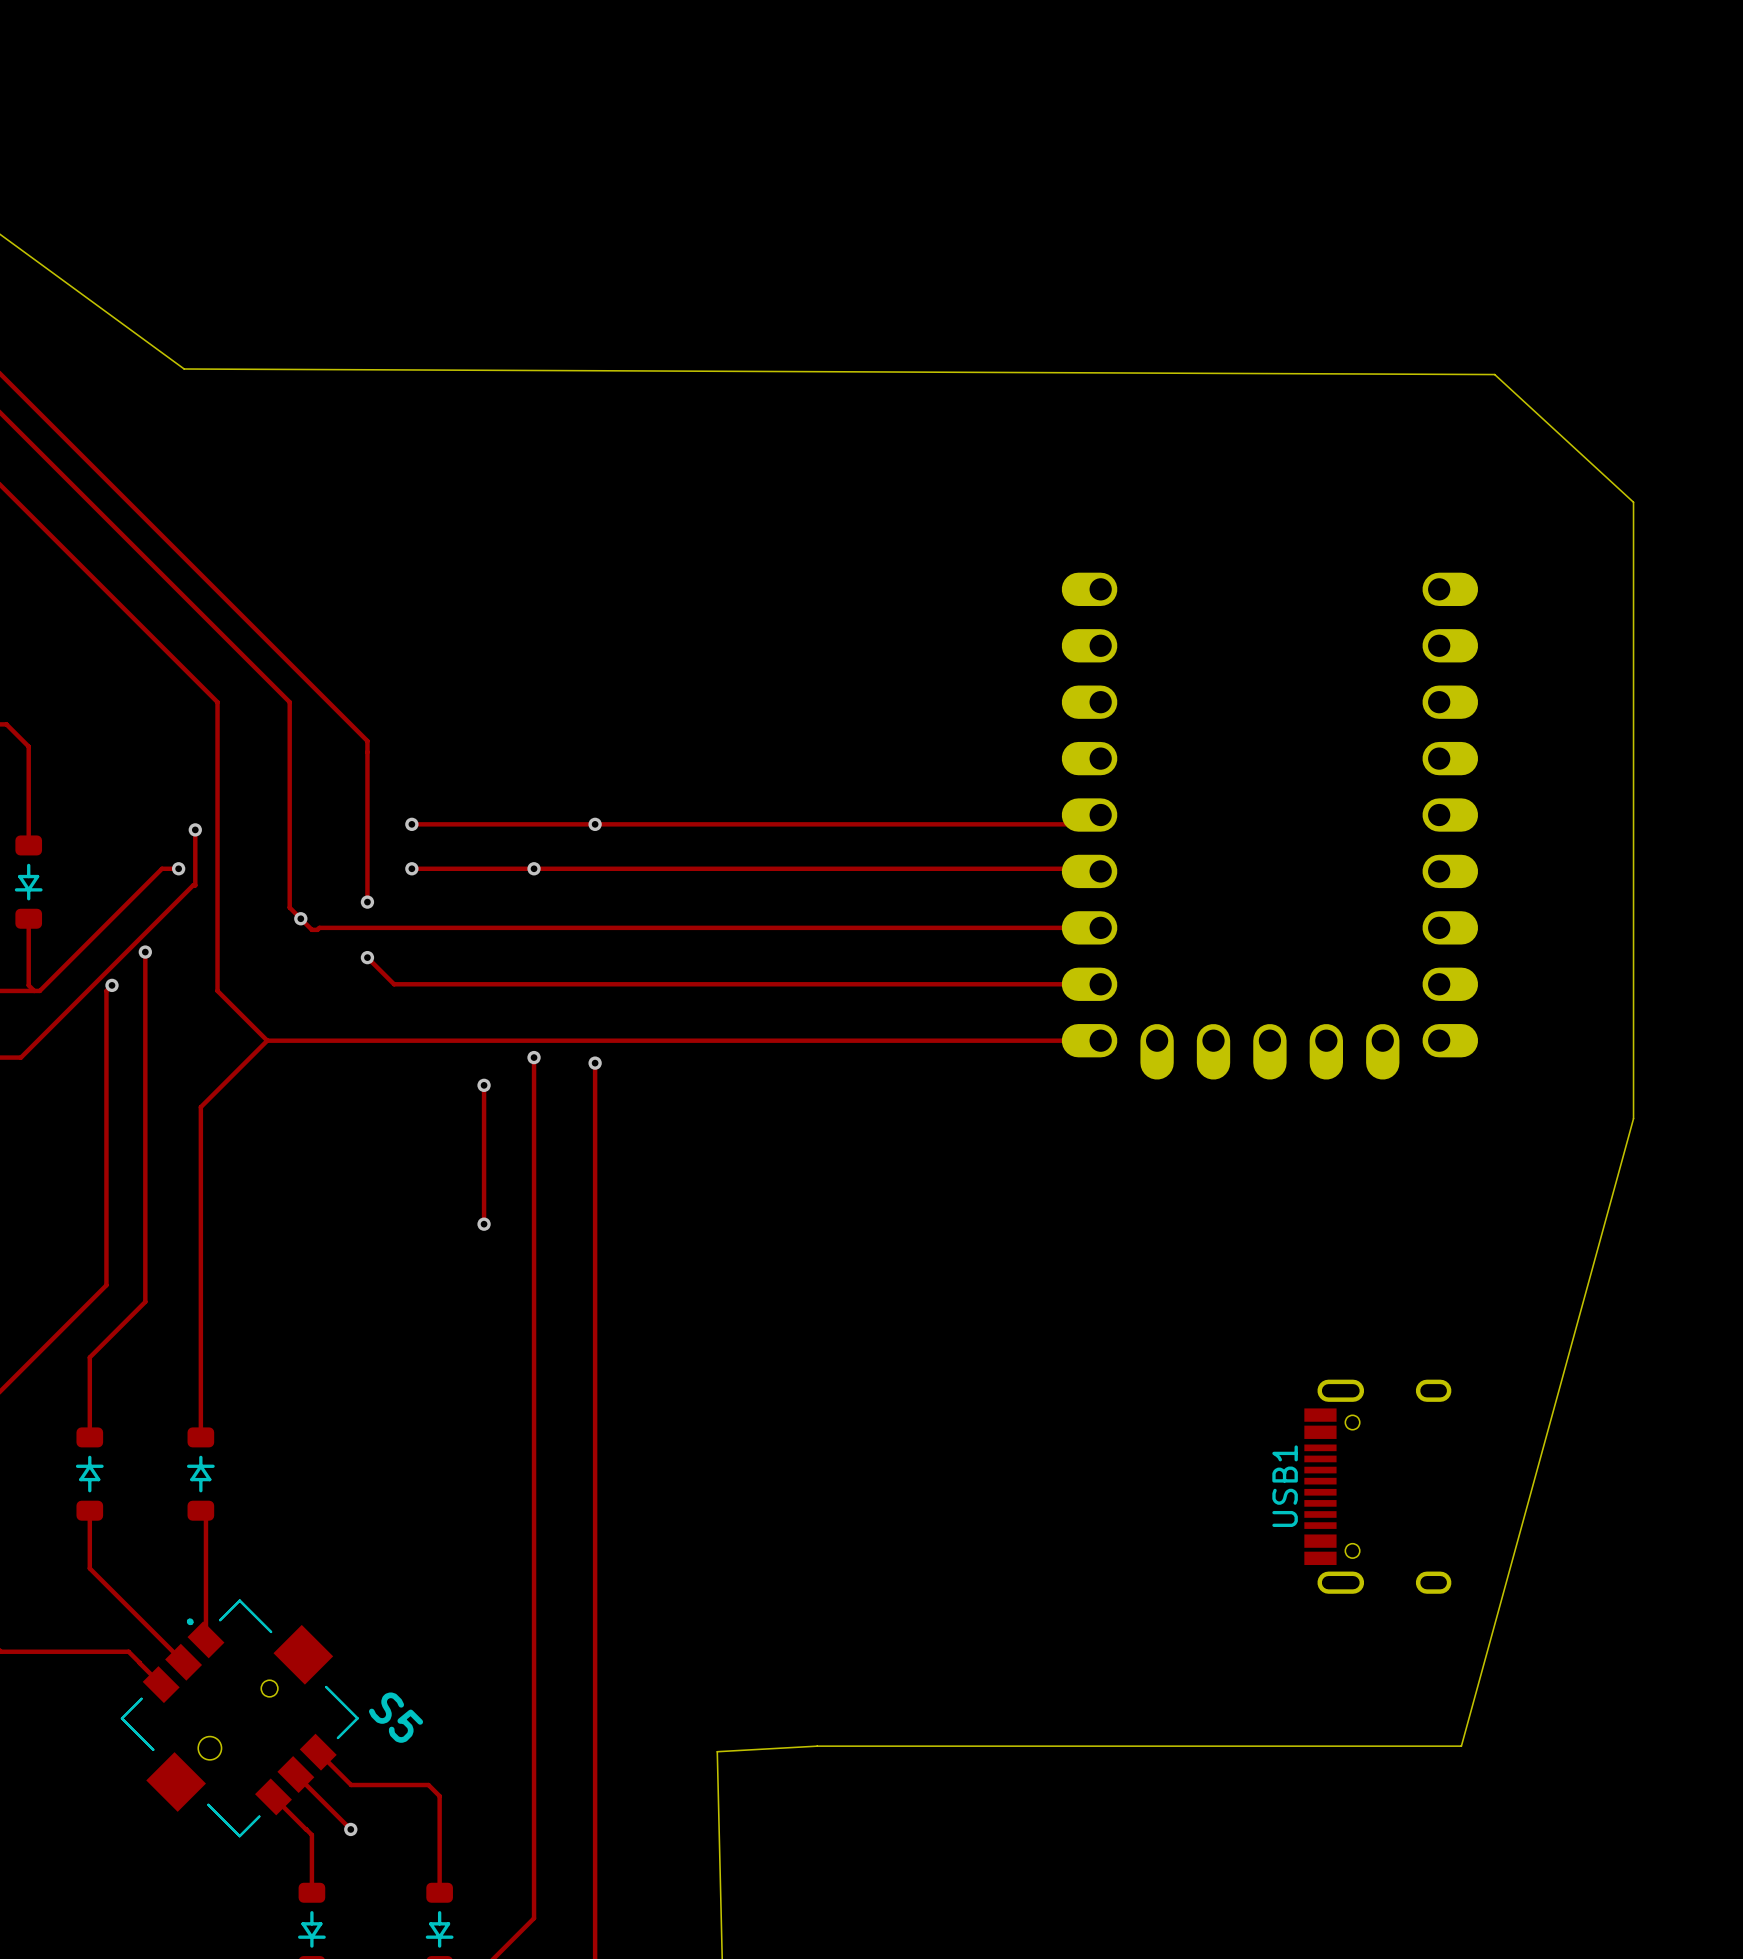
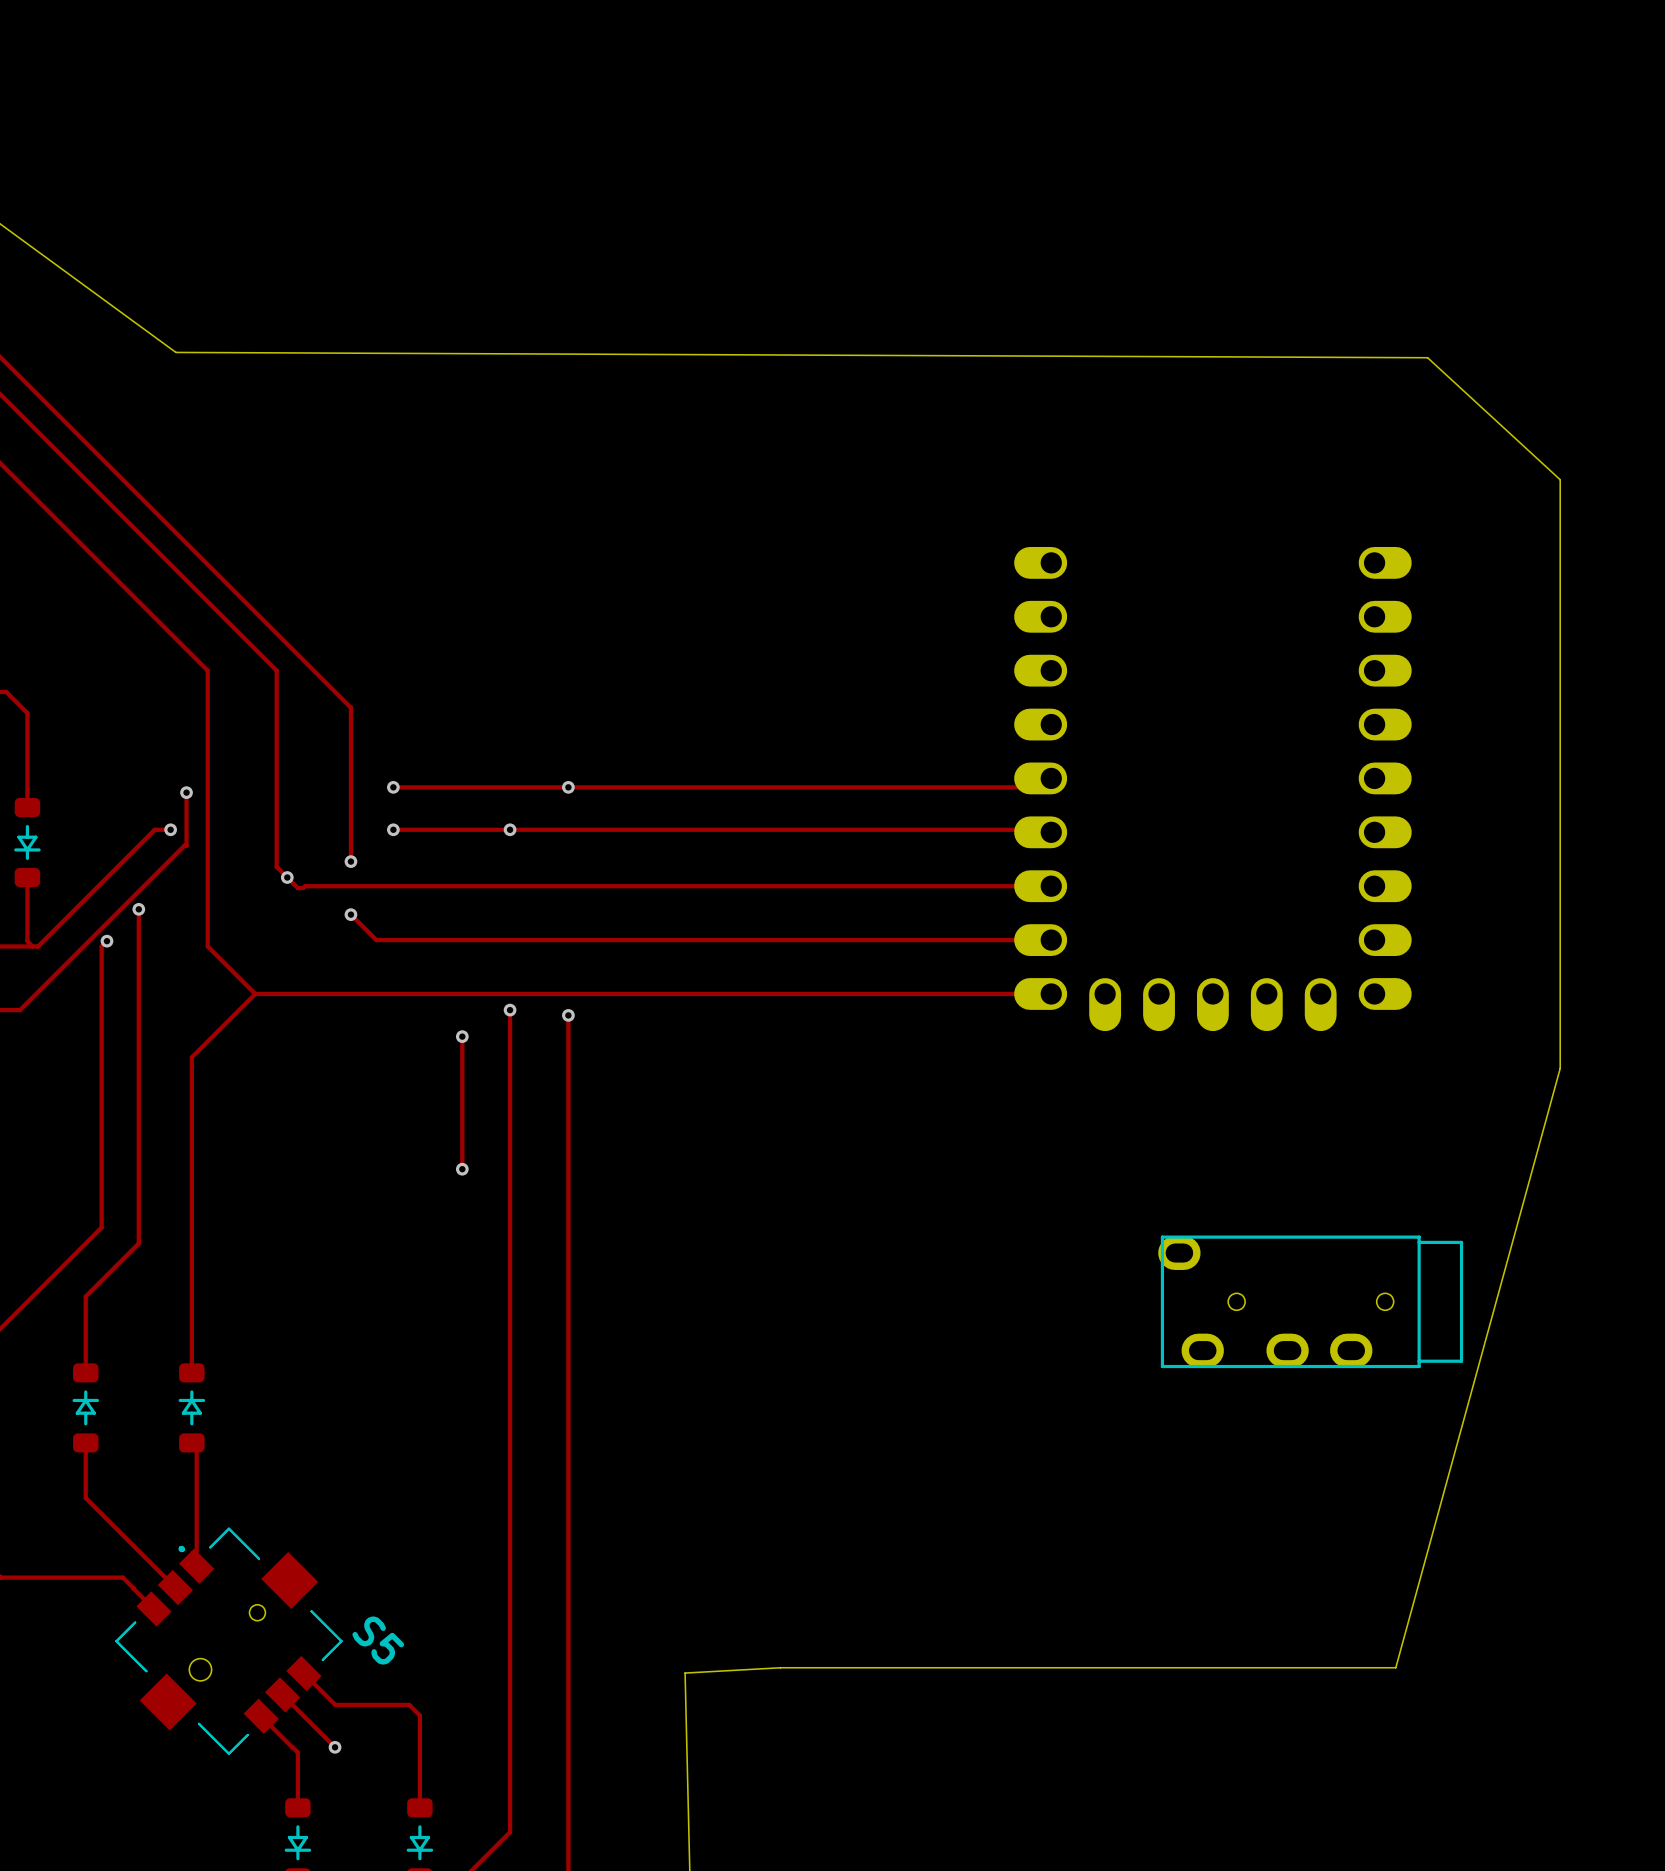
part: none -> (1310, 1301)
USB1: (1377, 1486) -> none

